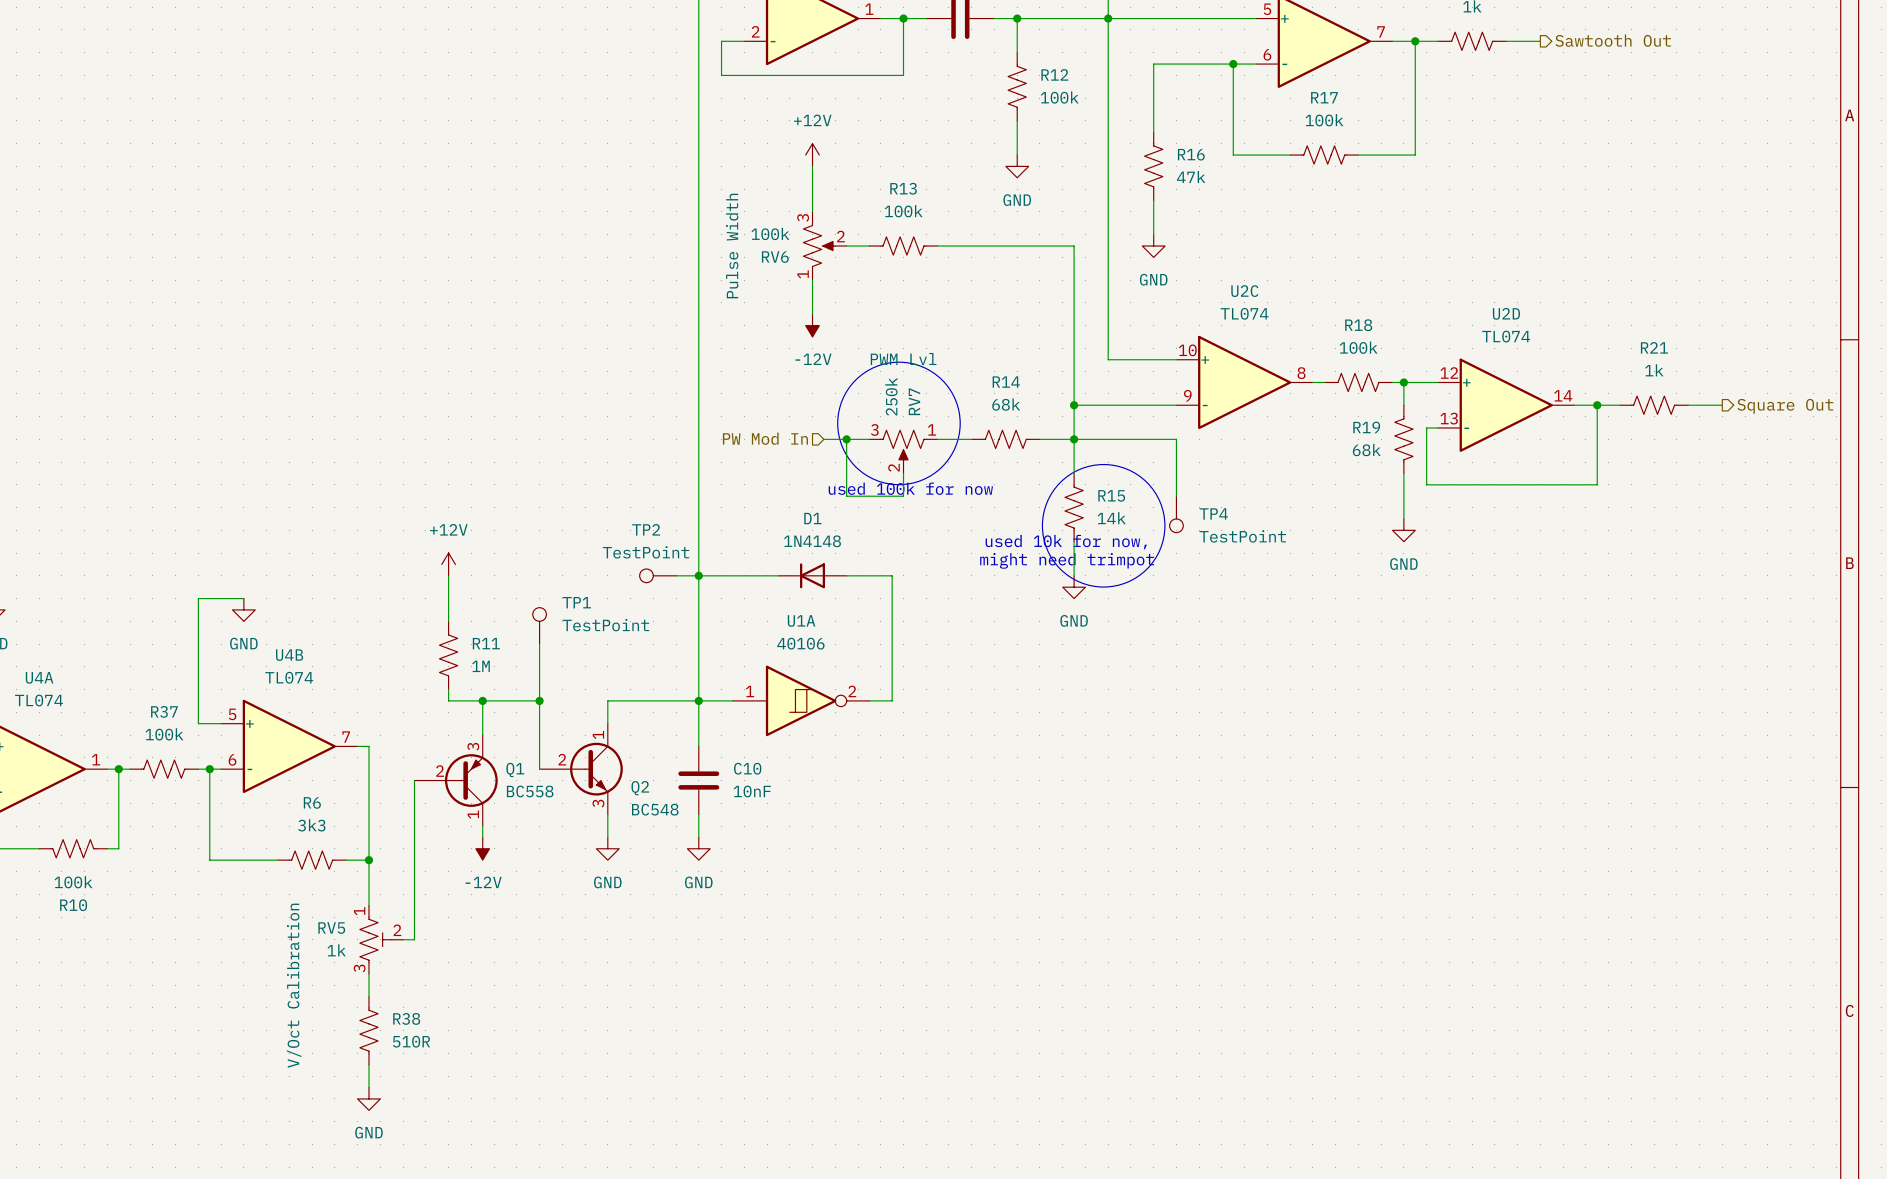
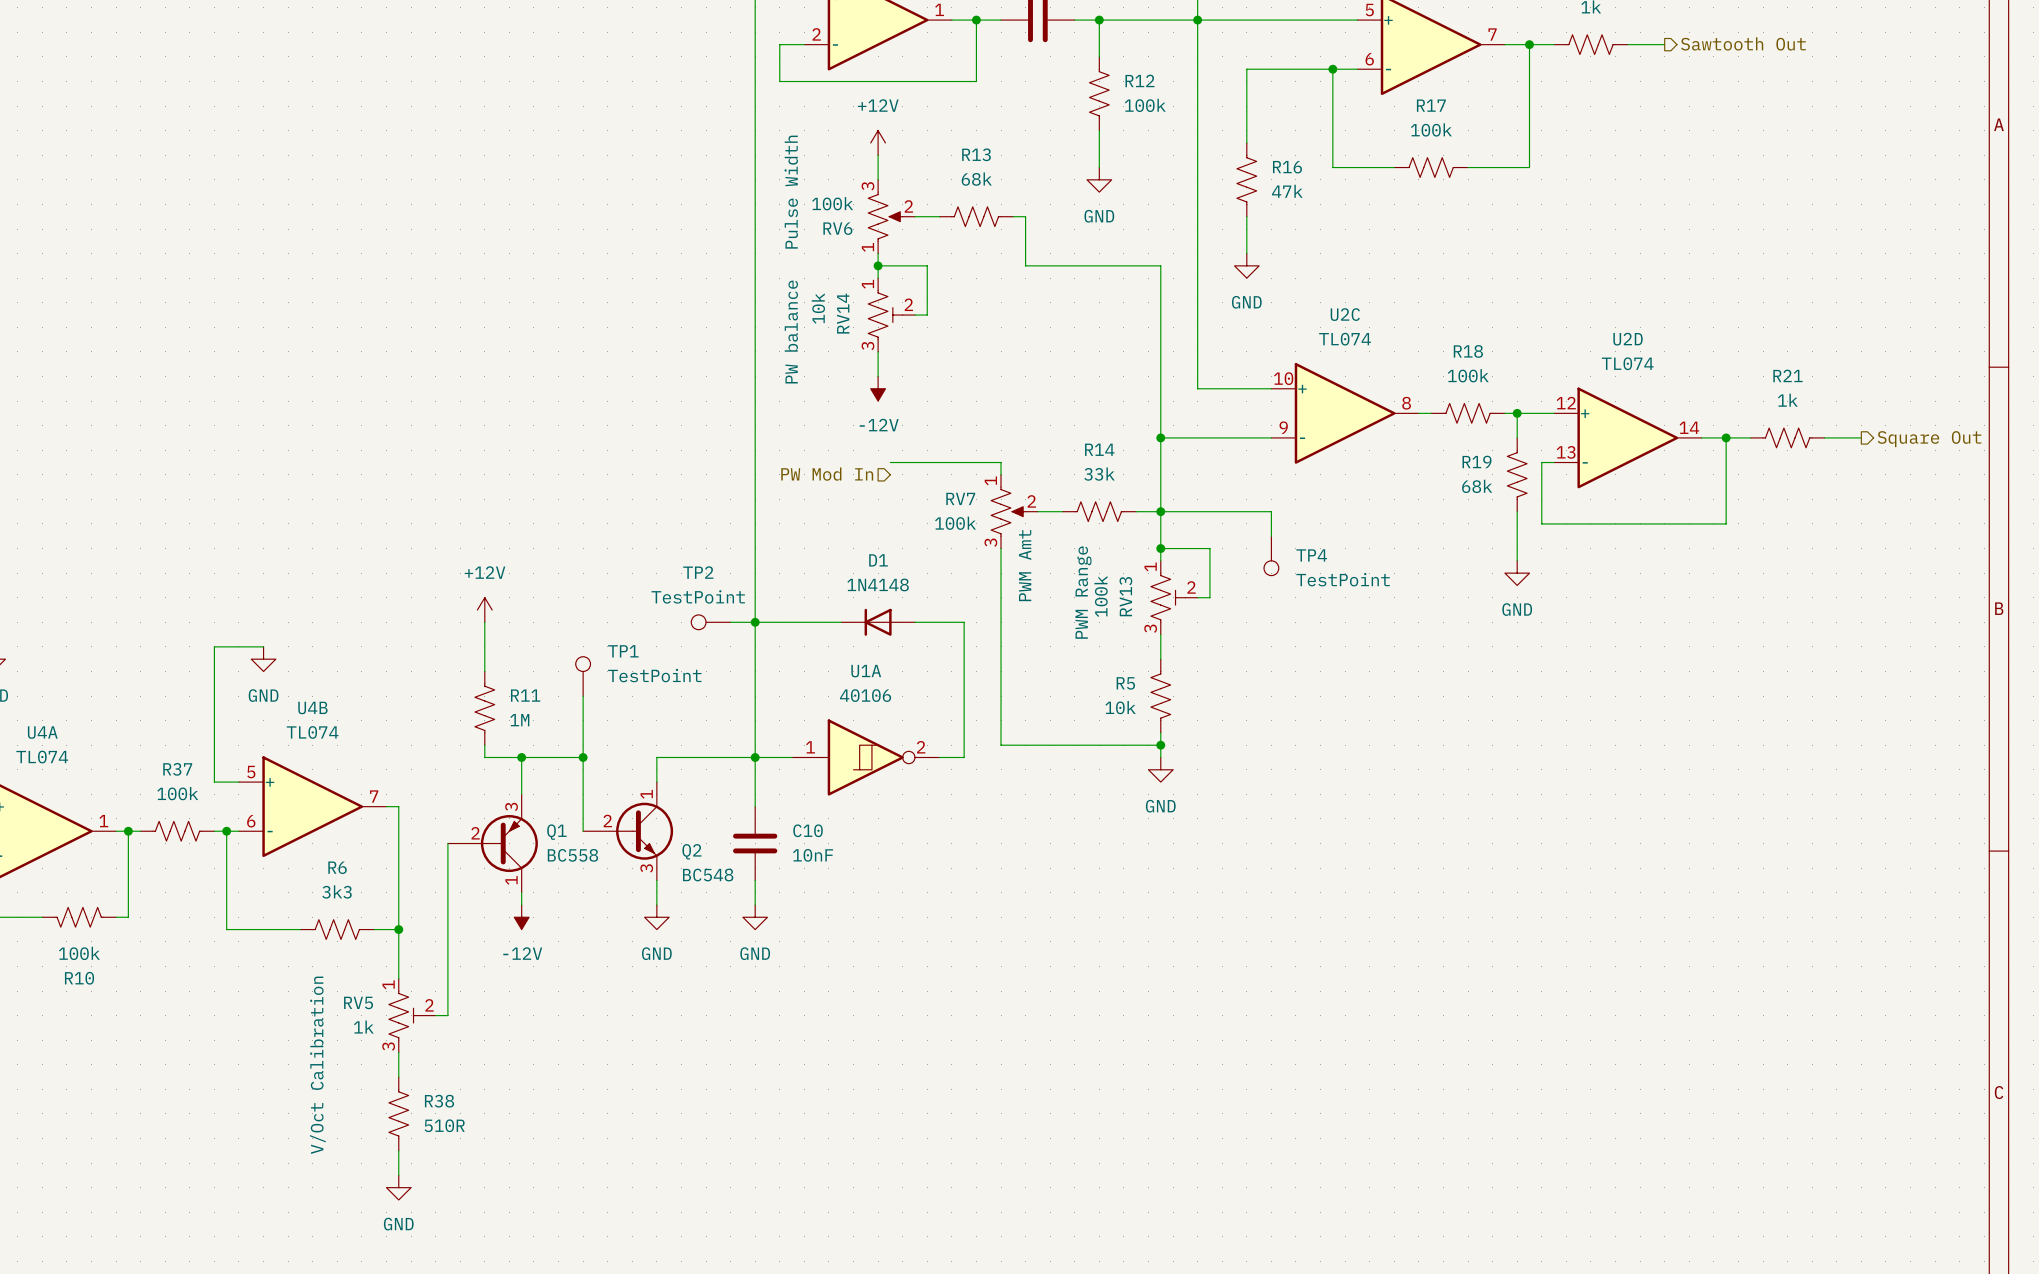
power symbol position: +12V (812, 155) -> +12V (878, 142)
wire: none -> (914, 216) (939, 216)
R13 value: 100k (903, 211) -> 68k (976, 179)
wire: none -> (878, 253) (878, 278)
RV6 text position: Pulse Width (732, 246) -> Pulse Width (791, 192)
junction: none -> (878, 265)
RV6 position: (825, 246) -> (891, 216)
wire: (858, 246) (869, 246) -> (927, 265) (927, 315) (914, 315)
R13 position: (903, 246) -> (976, 216)
wire: (937, 246) (948, 246) -> (1013, 216) (1025, 216) (1025, 265)
wire: (812, 280) (812, 314) -> none
RV14: none -> 10k (891, 315)
wire: none -> (878, 351) (878, 376)
power symbol position: -12V (812, 325) -> -12V (878, 388)
RV7 text: PWM Lvl (903, 358) -> PWM Amt (1025, 565)
drawing: [837, 362, 961, 485] -> none
RV7 value: 250k (891, 396) -> 100k (955, 523)
R14 value: 68k (1006, 404) -> 33k (1099, 474)
wire: none -> (890, 462) (1001, 462) (1001, 474)
wire: (823, 439) (869, 439) -> none
wire: (846, 439) (846, 496) (903, 496) (903, 473) -> none
junction: (846, 439) -> none
wire: (937, 439) (971, 439) -> none
R14 position: (1005, 439) -> (1099, 511)
wire: (1039, 439) (1176, 439) (1176, 473) -> (1136, 511) (1271, 511)
junction: (1074, 439) -> none
RV7 rotation: 0° (903, 446) -> 90° counterclockwise (1008, 511)
RV7 position: (903, 451) -> (1014, 511)
drawing: [1042, 464, 1165, 588] -> none
wire: none -> (1037, 511) (1062, 511)
wire: none -> (1160, 511) (1160, 560)
junction: none -> (1160, 511)
text: used 100k for now (910, 488) -> none
wire: none -> (1001, 548) (1001, 745) (1160, 745)
wire: none -> (1160, 548) (1209, 548) (1209, 597) (1197, 597)
junction: none -> (1160, 548)
R15: 14k (1074, 507) -> none
wire: (1074, 541) (1074, 575) -> none
text: used 10k for now, (1066, 542) -> none
RV13: none -> 100k (1174, 597)
text: might need trimpot (1067, 560) -> none
wire: none -> (1160, 634) (1160, 659)
power symbol position: GND (1074, 587) -> GND (1160, 769)
R5: none -> 10k (1160, 696)
wire: none -> (1160, 732) (1160, 757)
junction: none -> (1160, 745)

